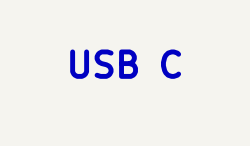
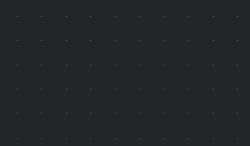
text: USB C (125, 64) -> none

